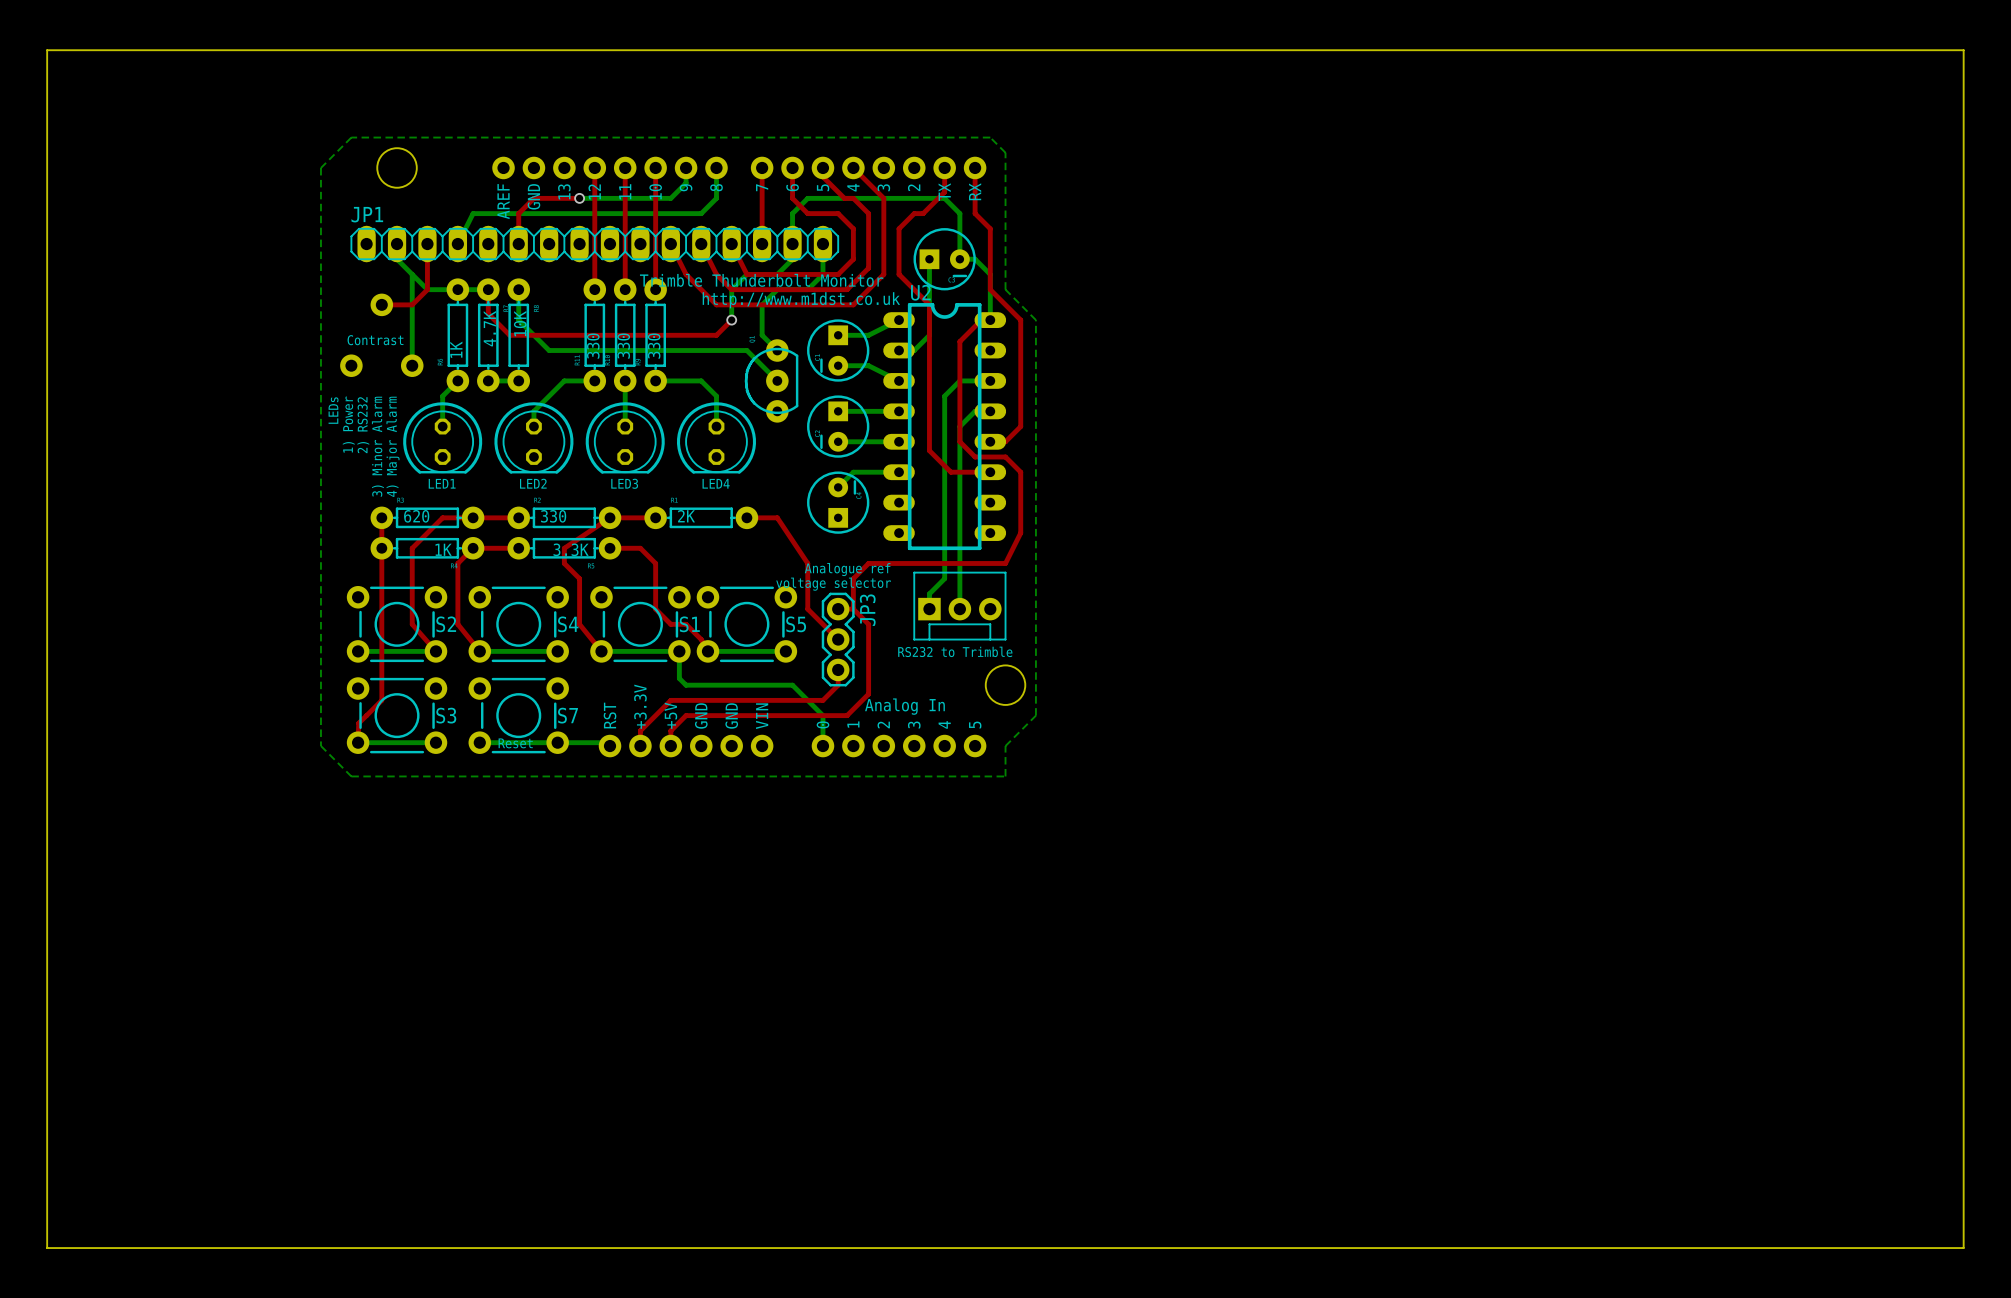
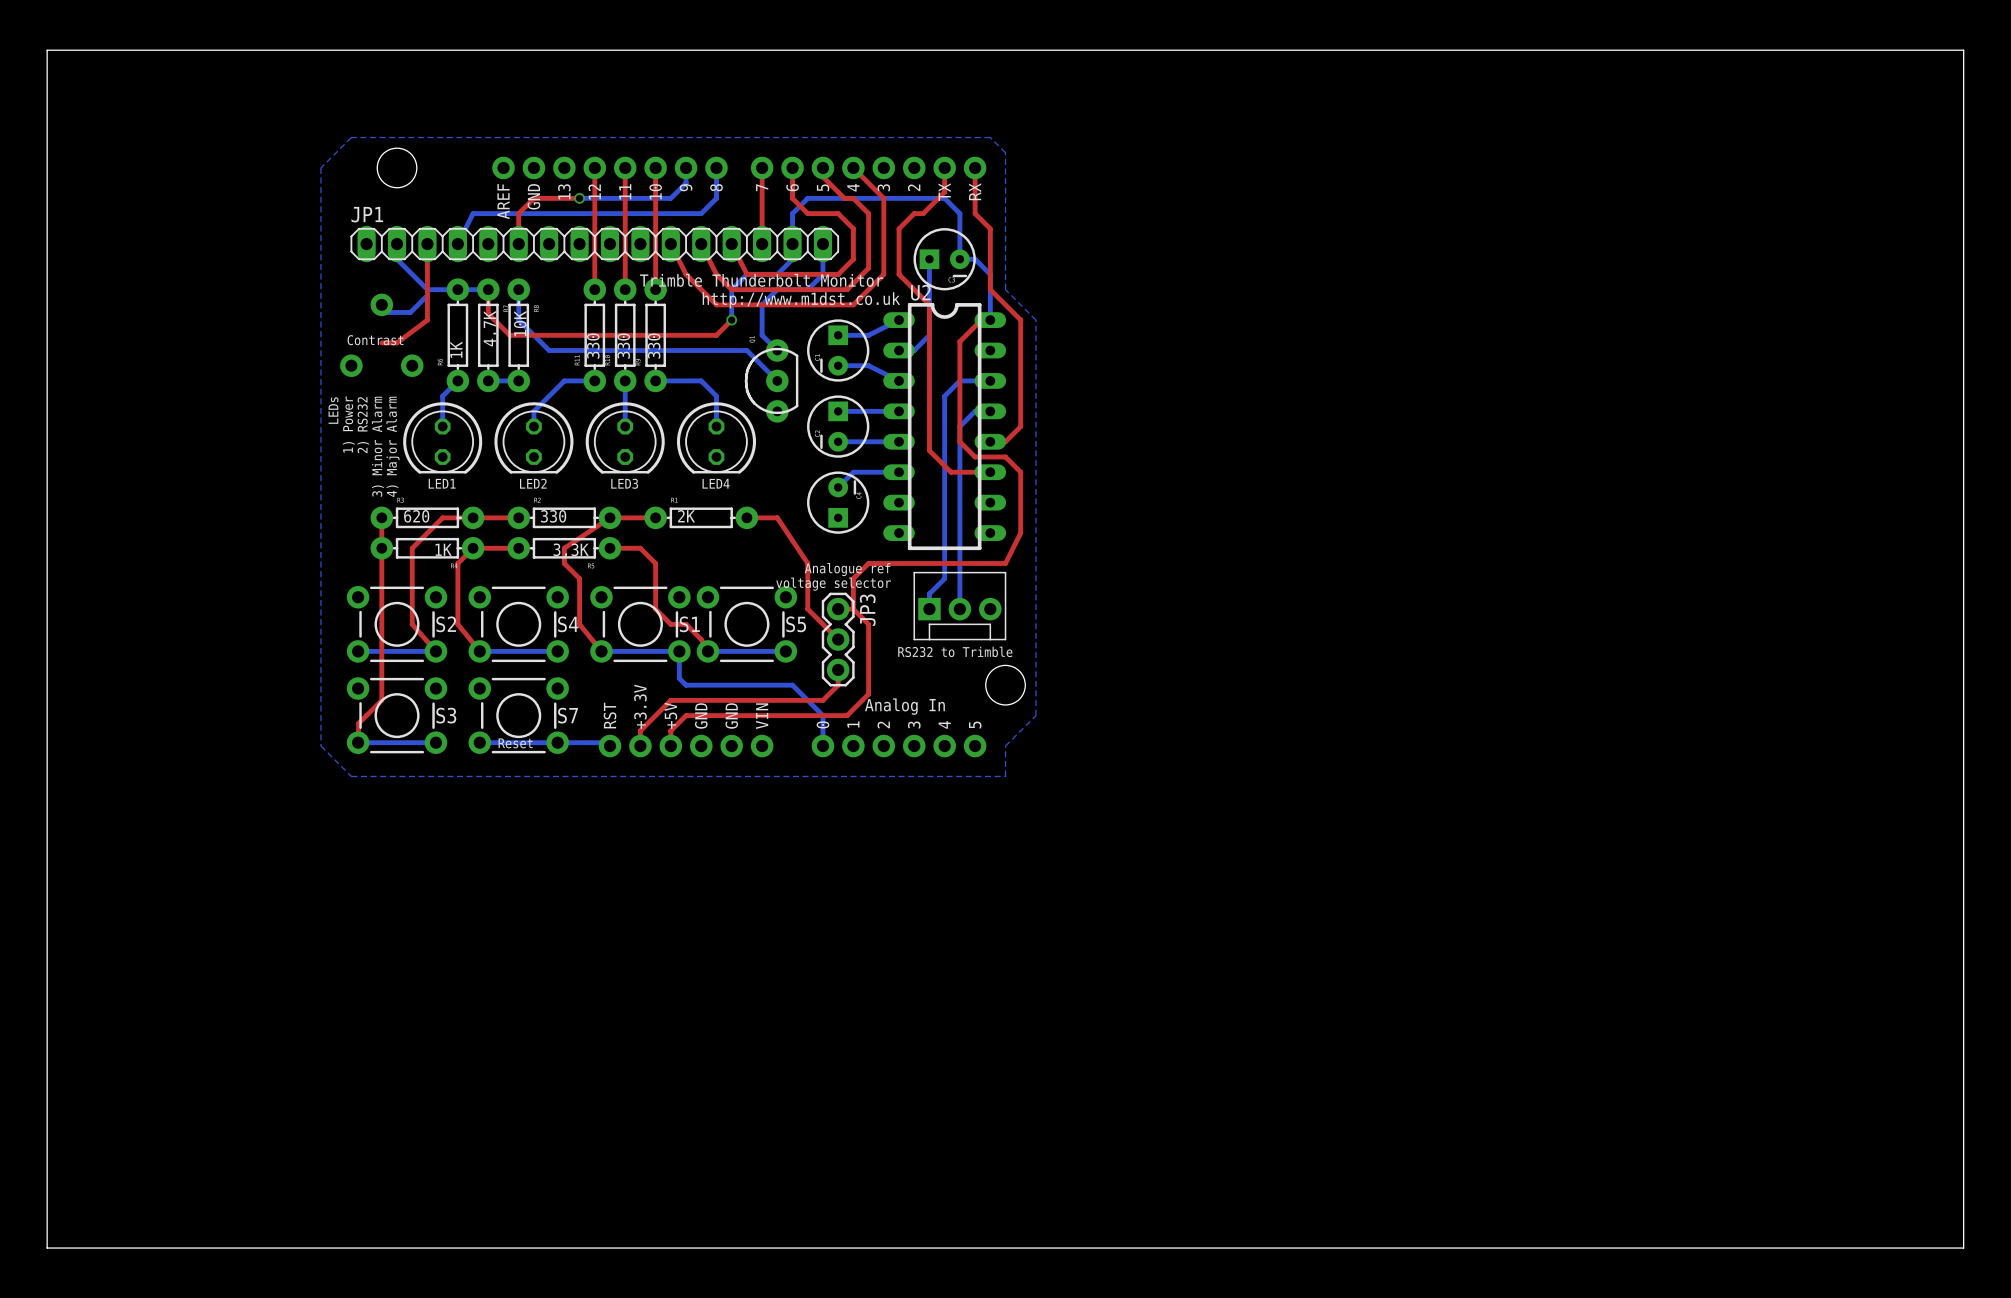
bottom track: (412, 274) (412, 365) -> none
bottom track: none -> (427, 289) (427, 295) (410, 312) (381, 312)
top track: (427, 289) (412, 304) (381, 304) -> (427, 289) (427, 320) (397, 342) (381, 342)

